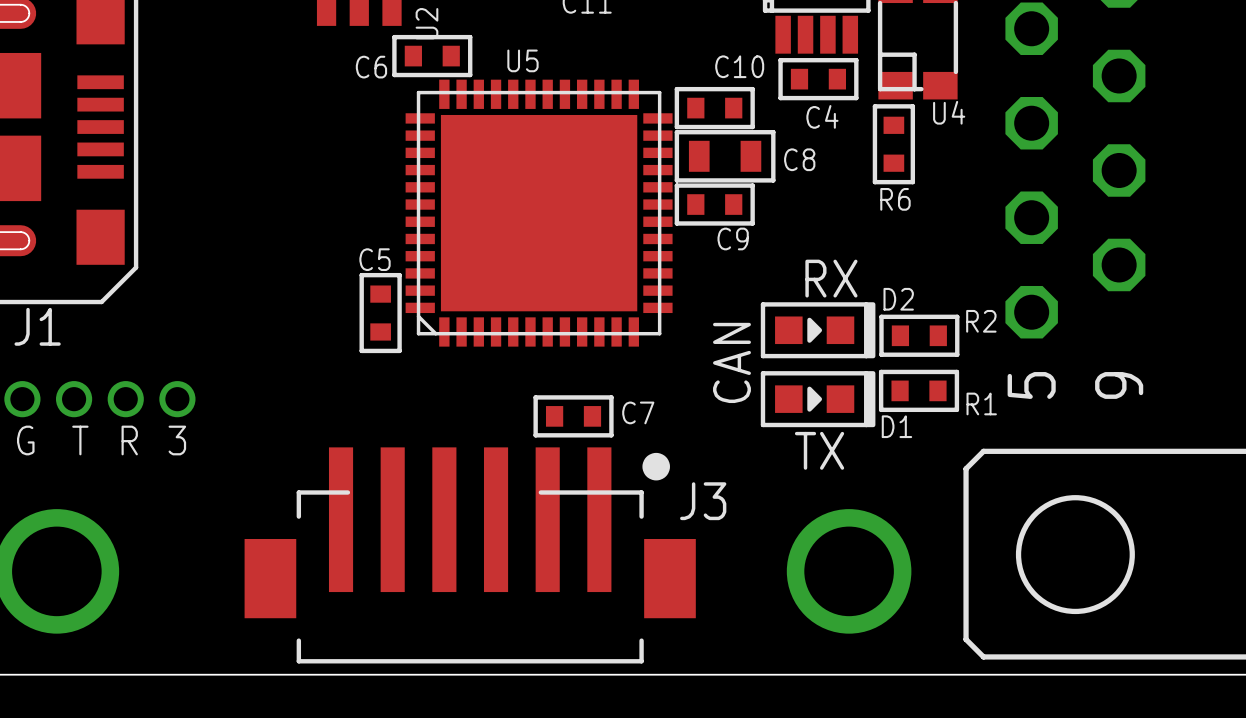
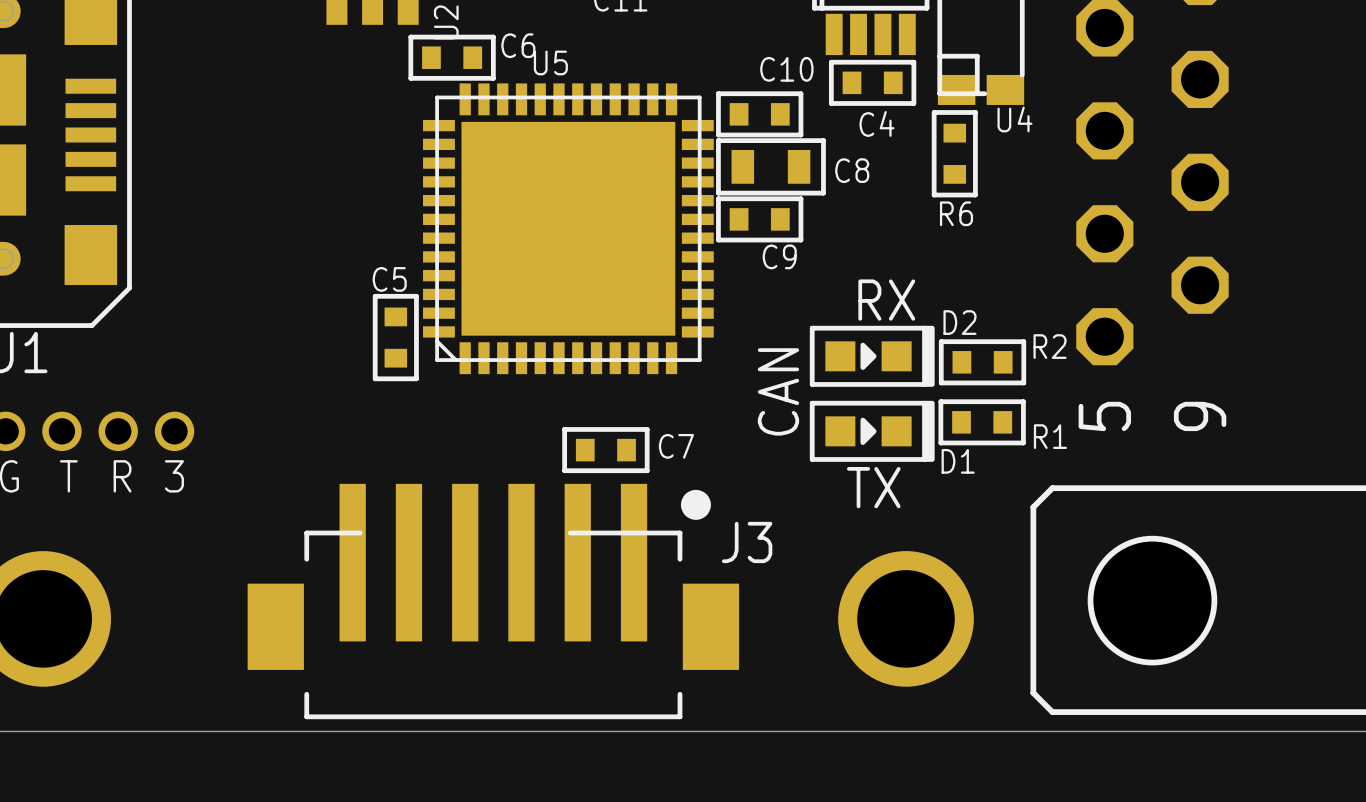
C6 name position: C6 (371, 67) -> C6 (518, 45)

